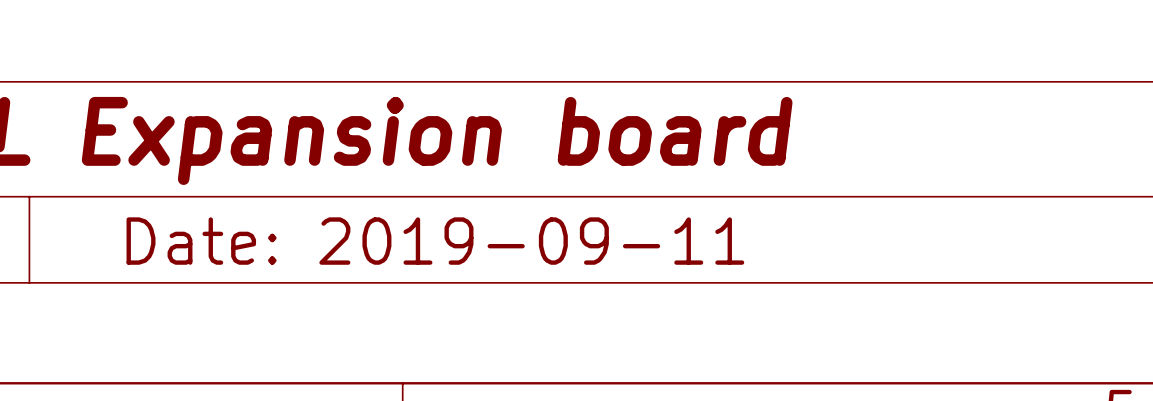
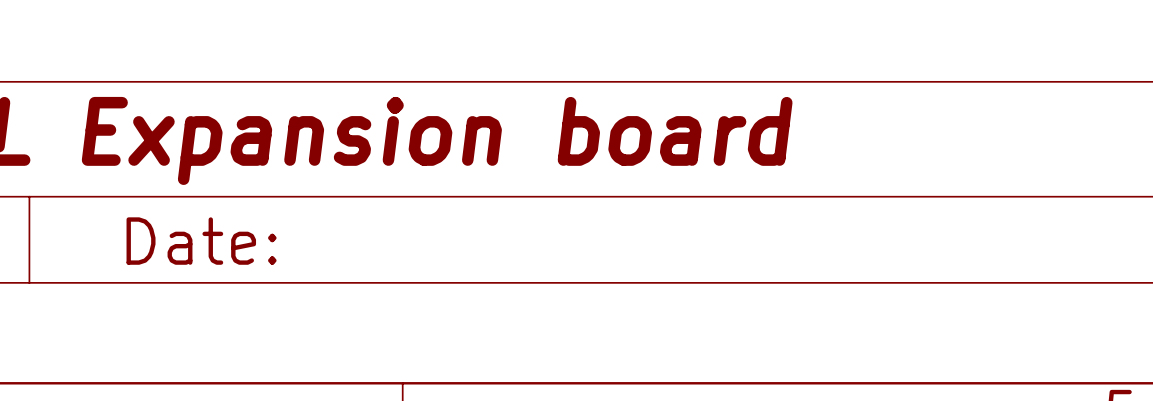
title block: Date: 2019-09-11 (435, 241) -> Date: (201, 241)

